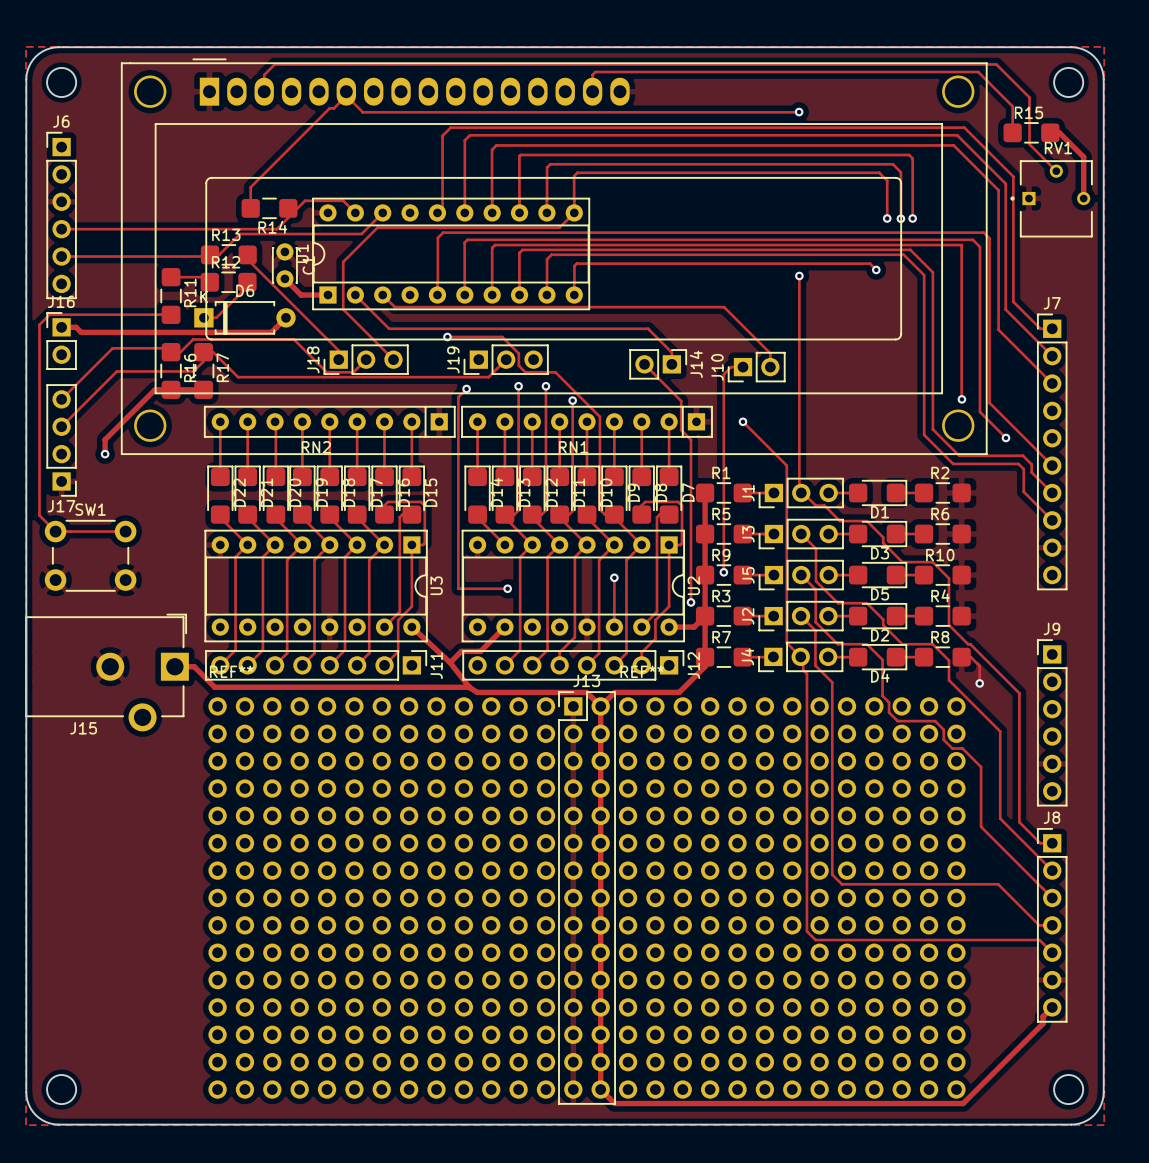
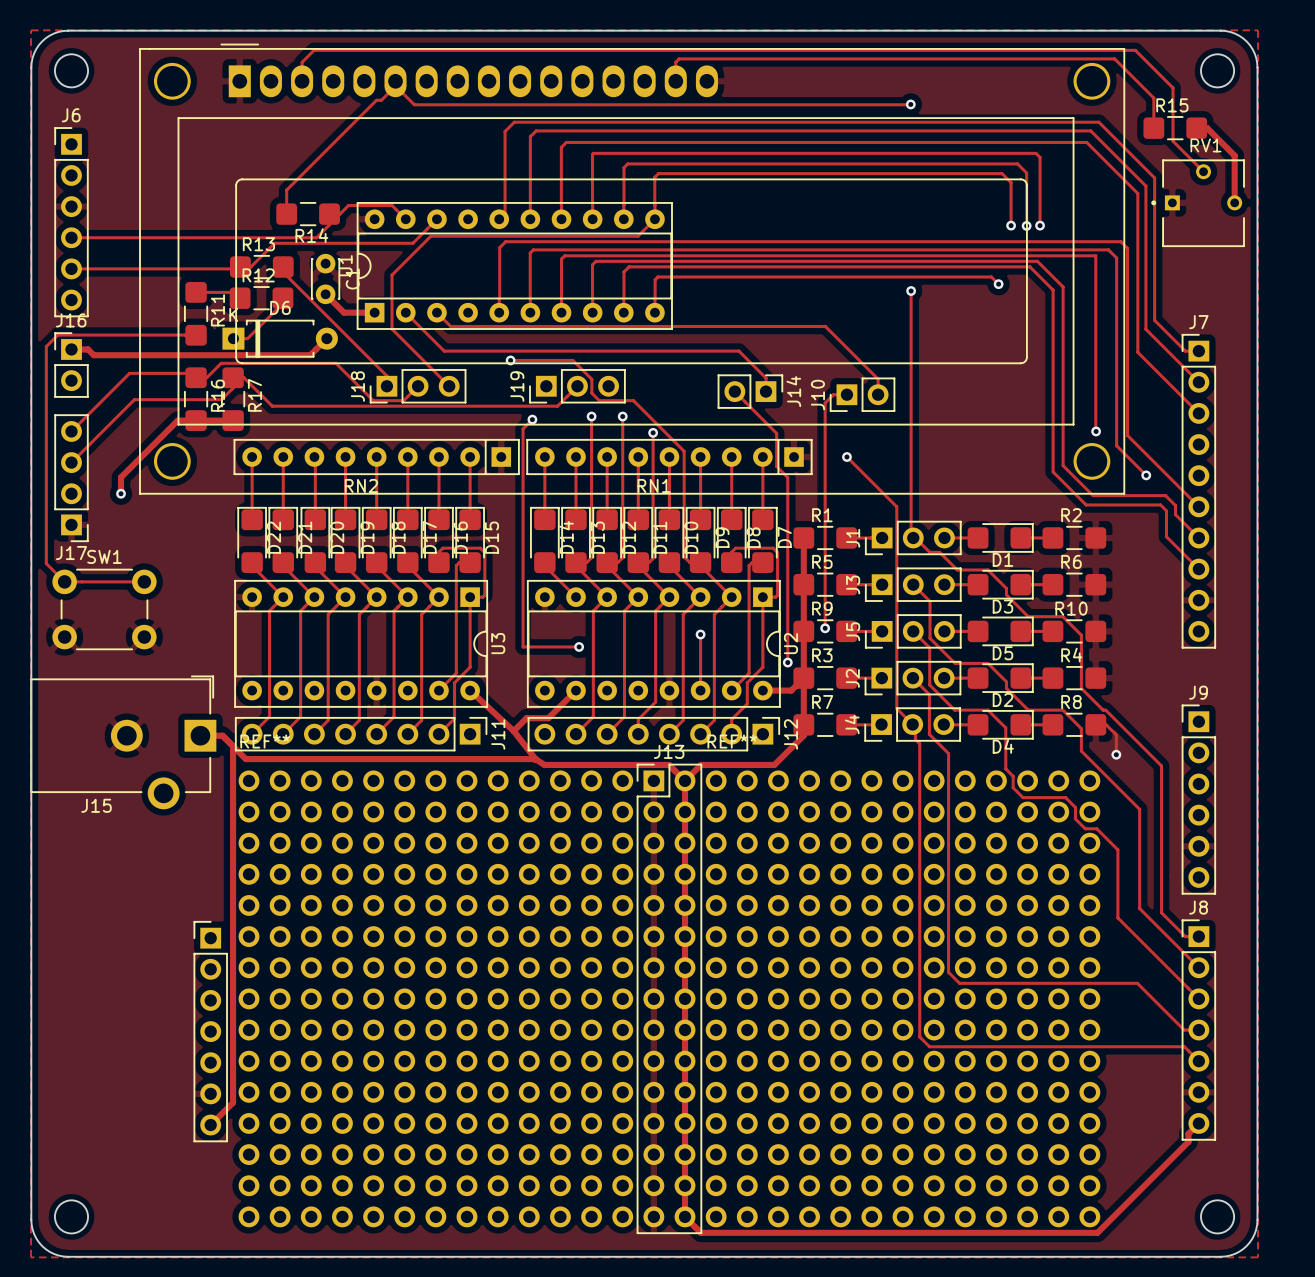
track: none -> (233, 746) (233, 1102) (210, 1125)
part: none -> (210, 1031)

